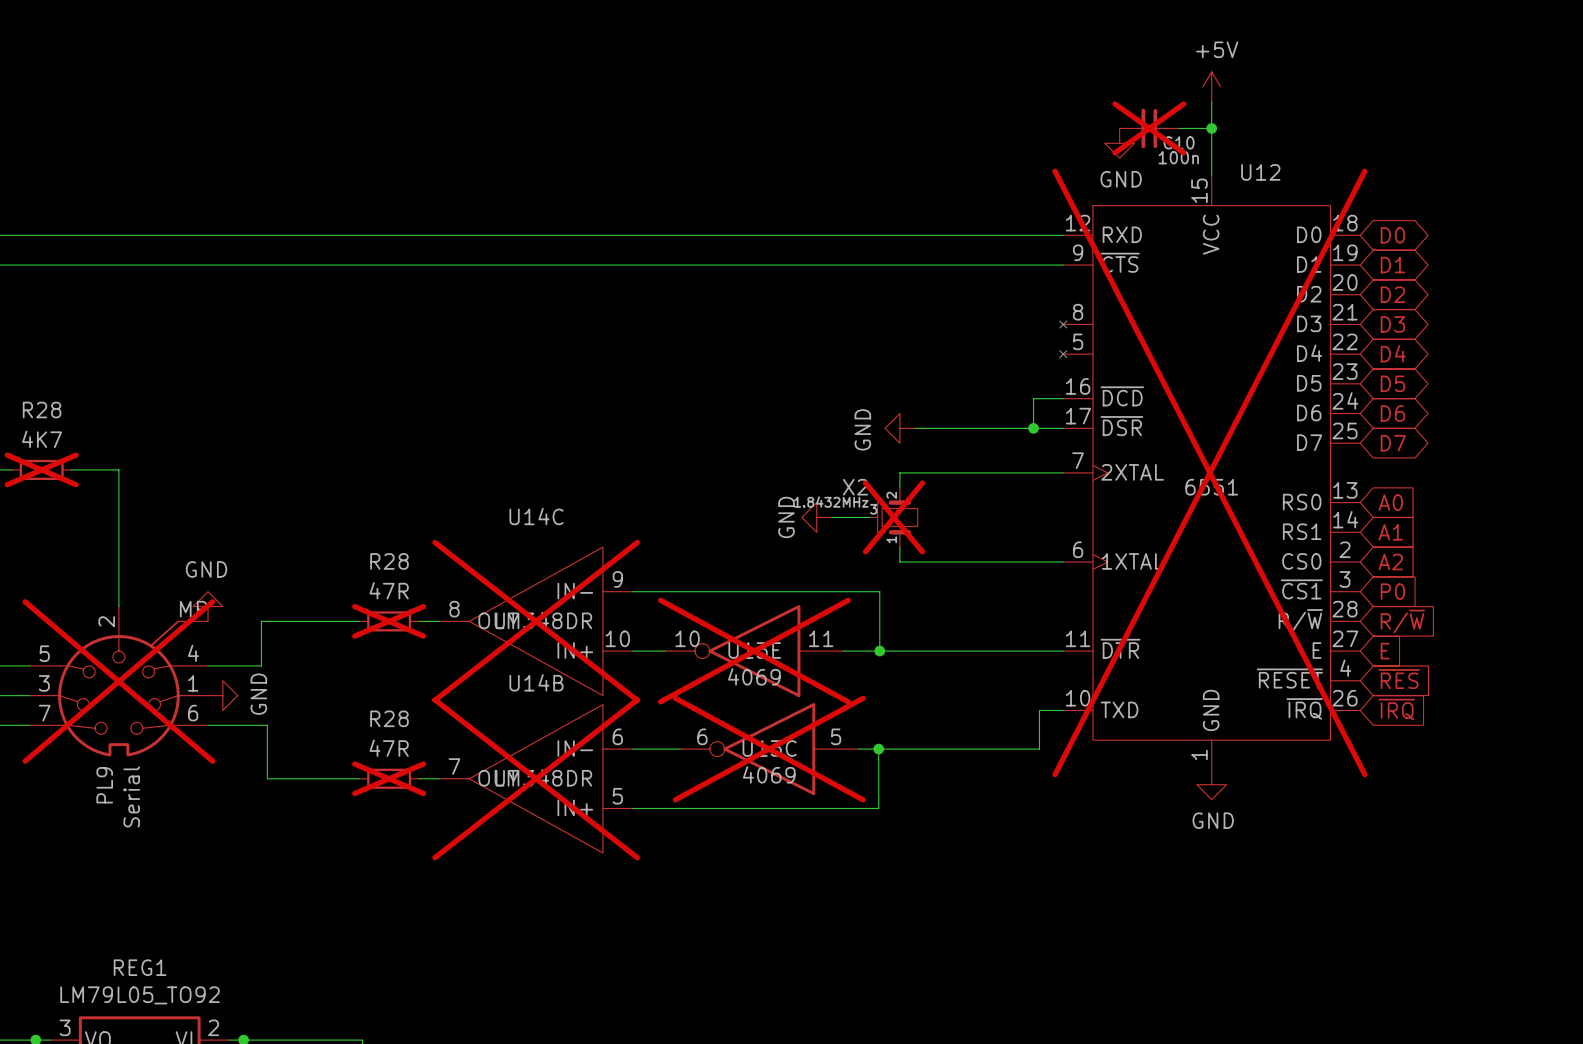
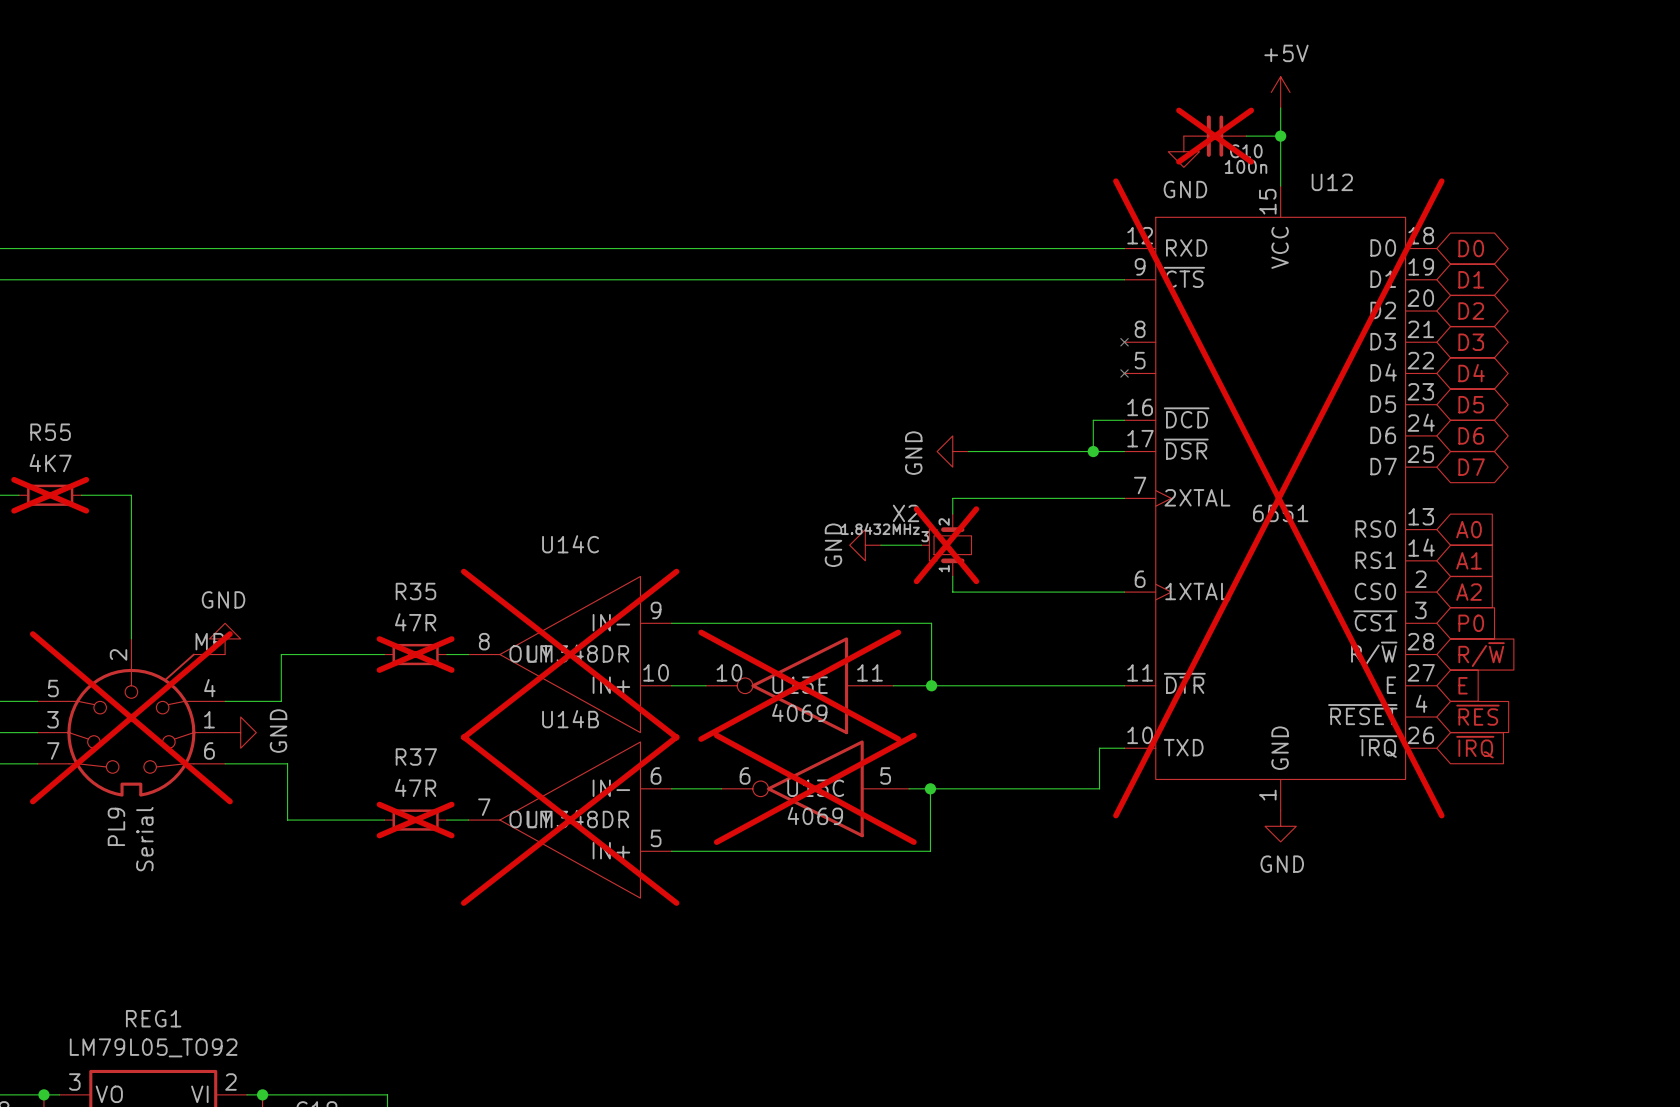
R28 name: R28 (42, 410) -> R55 (50, 432)
R28 name: R28 (389, 561) -> R35 (415, 591)
R28 name: R28 (389, 718) -> R37 (416, 757)

